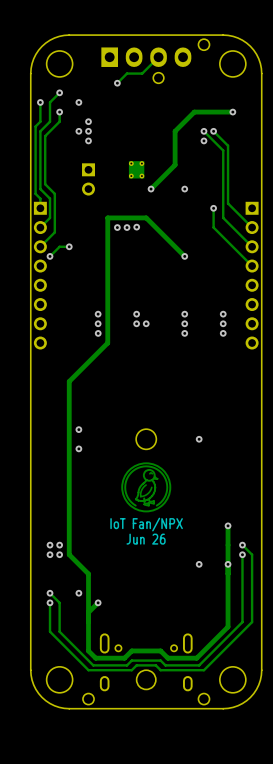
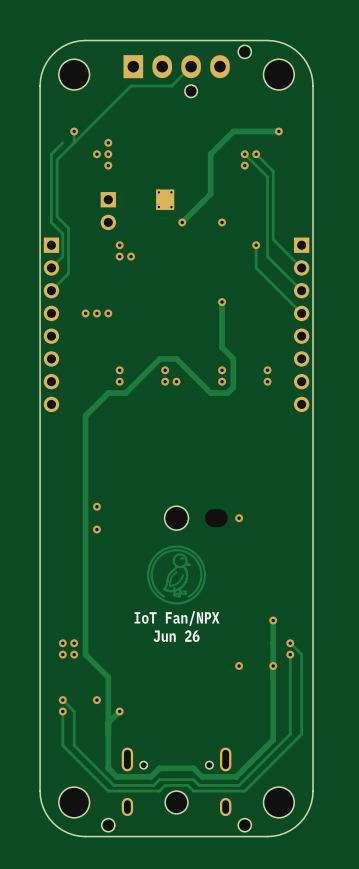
track: (127, 73) (117, 83) -> (153, 85) (131, 85) (74, 142)
via: (117, 83) -> none
track: (59, 92) (50, 102) (50, 121) -> none
via: (59, 92) -> none
track: (40, 102) (40, 121) (35, 126) (35, 193) (40, 198) (40, 208) -> none
via: (40, 102) -> none
via: (78, 102) -> none
via: none -> (119, 245)
via: none -> (119, 256)
via: none -> (131, 256)
via: (117, 227) -> none
via: (127, 227) -> none
via: (136, 227) -> none
track: (69, 246) (59, 246) (50, 256) -> none
via: (69, 246) -> none
via: (50, 256) -> none
track: (184, 256) (146, 217) (107, 217) (107, 343) (69, 381) -> (222, 302) (222, 347) (233, 358) (233, 387) (227, 393) (210, 393) (176, 358) (159, 358) (125, 393) (108, 393) (85, 415) (85, 449)
via: none -> (85, 313)
via: none -> (96, 313)
via: none -> (108, 313)
via: (98, 333) -> none
via: (184, 333) -> none
via: (223, 333) -> none

